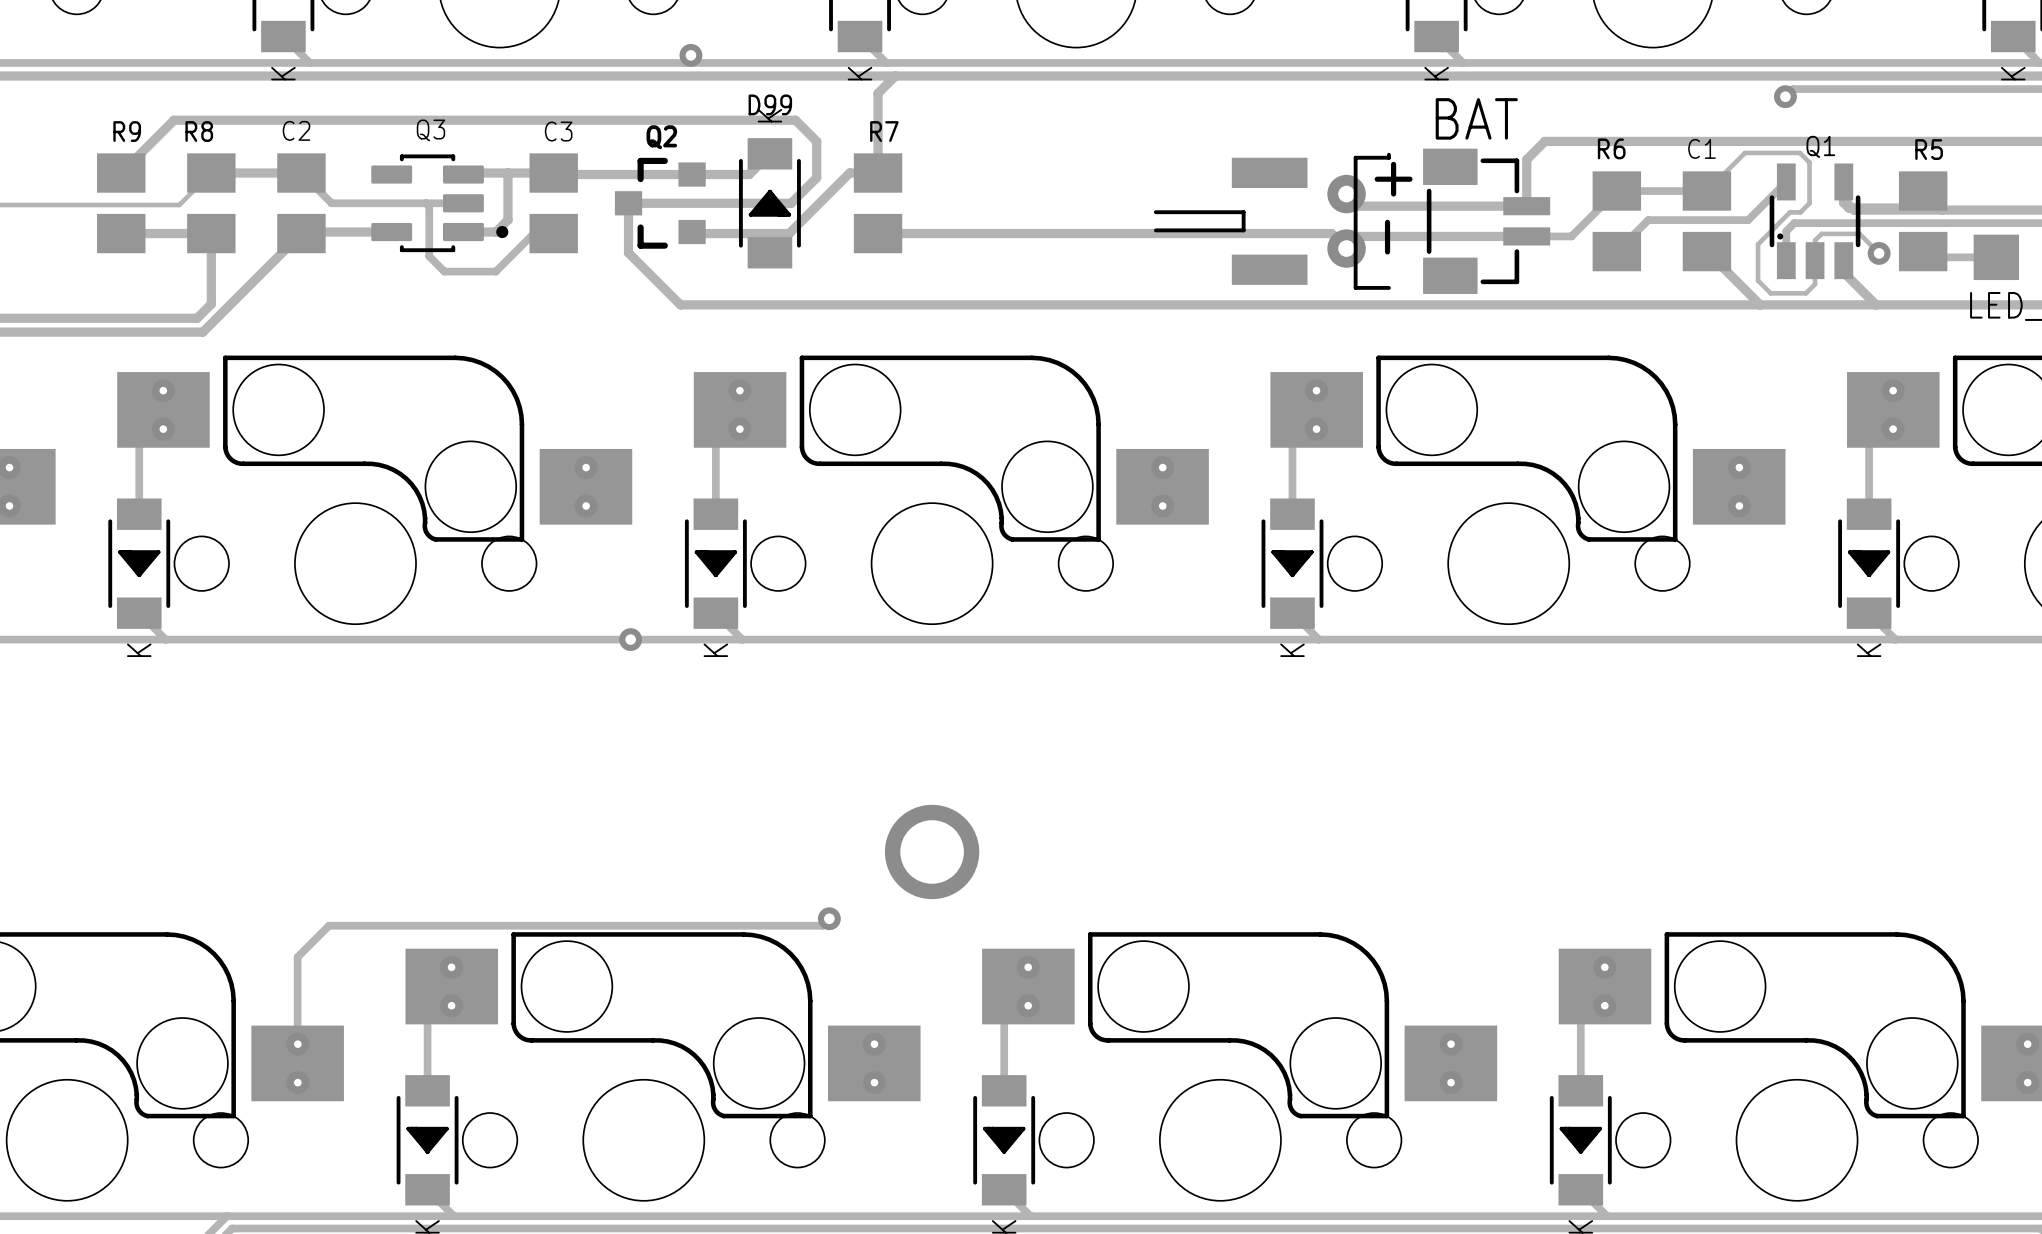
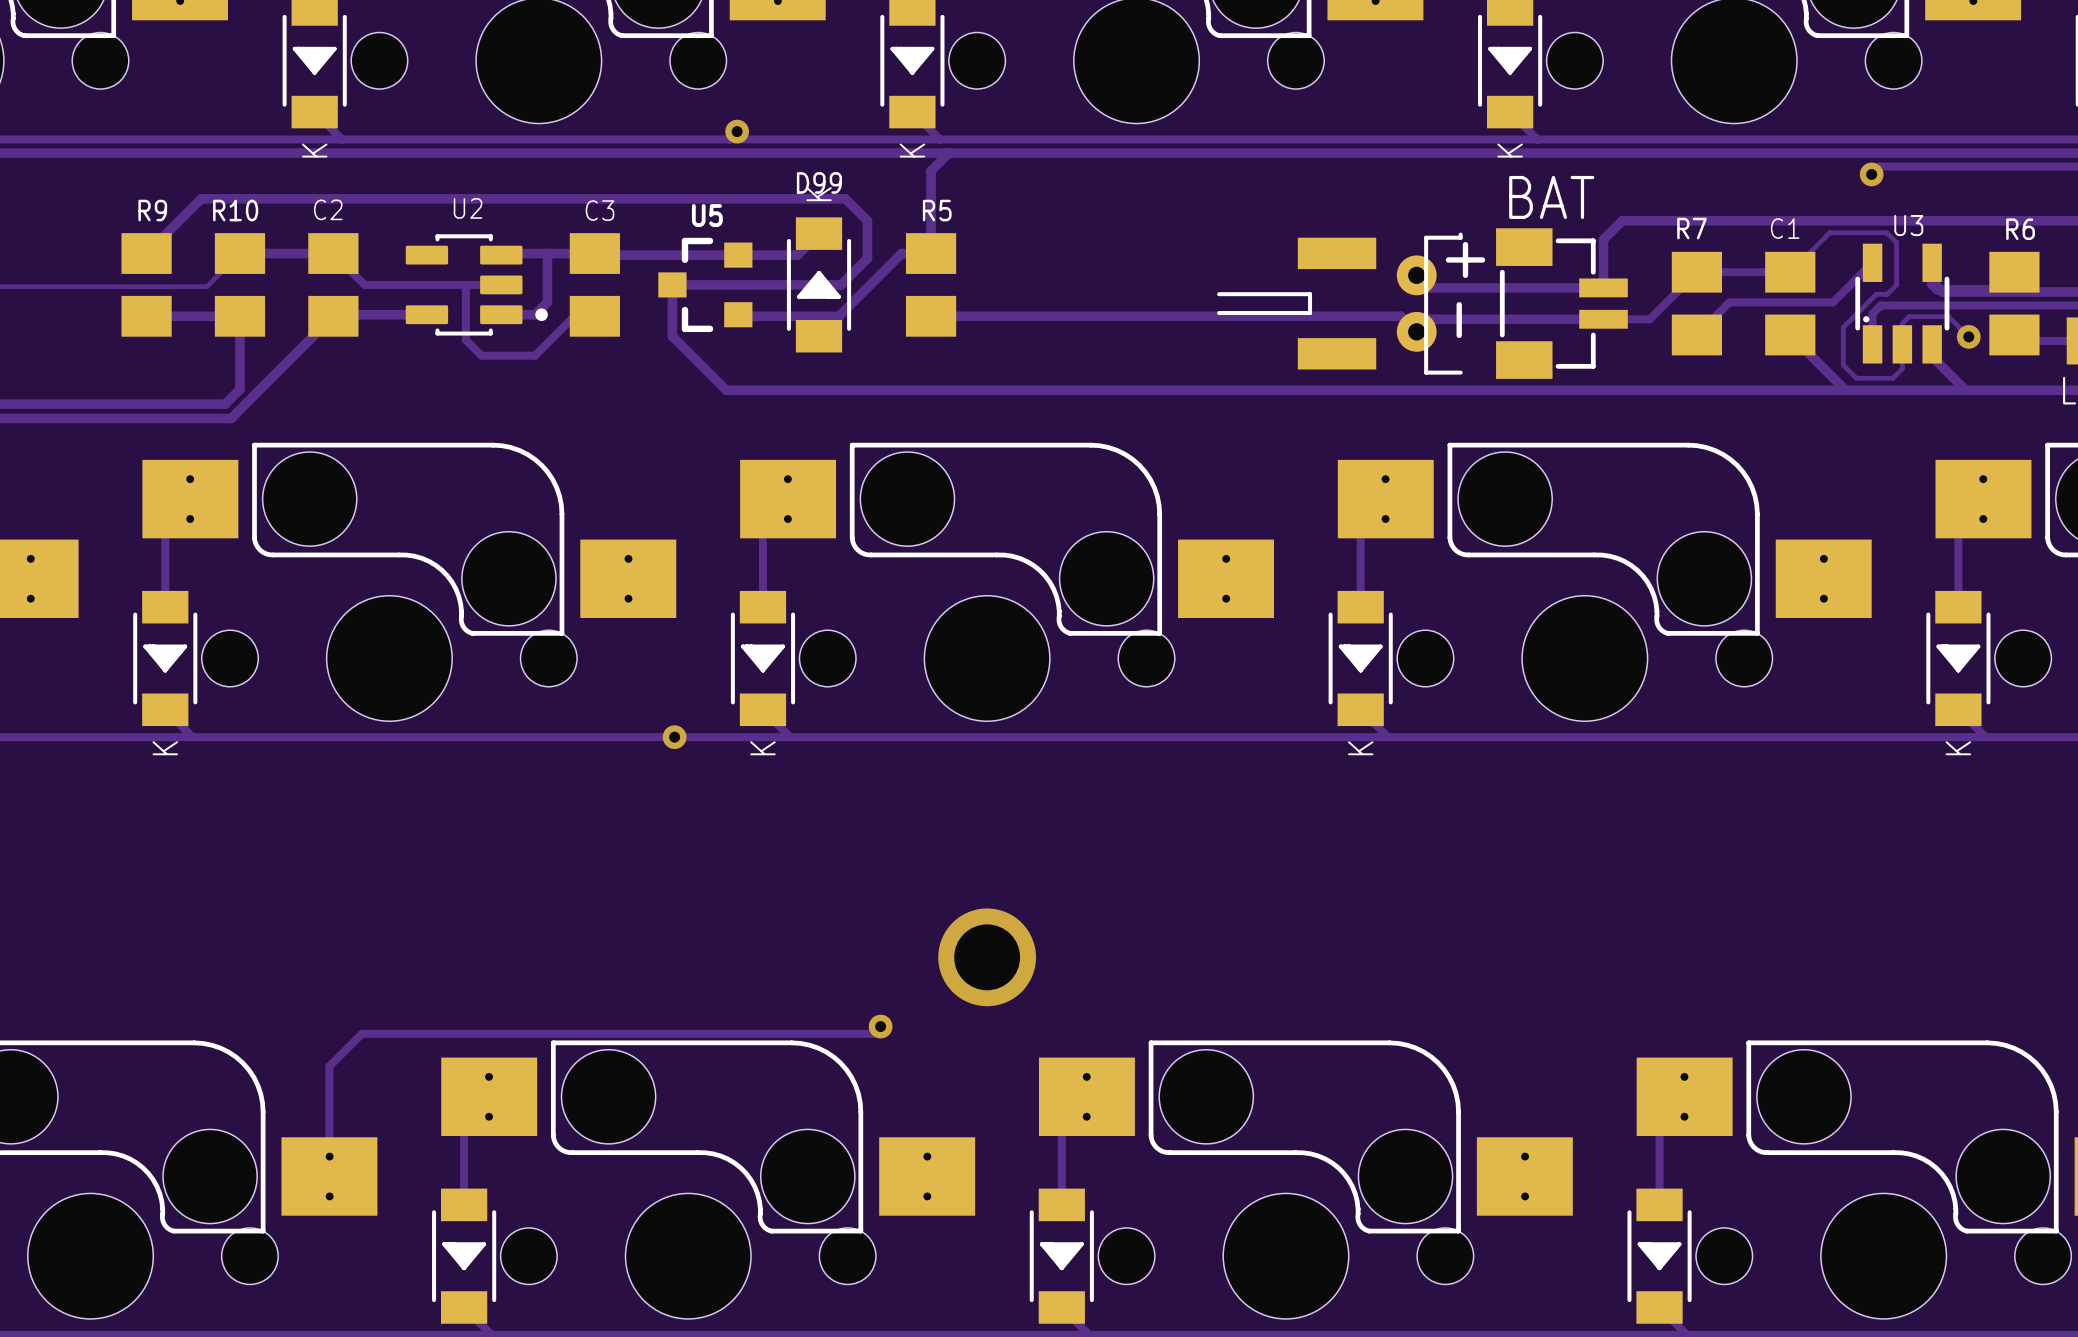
Q3 name: Q3 (430, 130) -> U2 (468, 208)
R8 name: R8 (199, 131) -> R10 (235, 210)
R7 name: R7 (884, 131) -> R5 (937, 210)
Q2 name: Q2 (661, 137) -> U5 (707, 215)
Q1 name: Q1 (1820, 146) -> U3 (1908, 225)
R6 name: R6 (1611, 148) -> R7 (1691, 228)
R5 name: R5 (1929, 149) -> R6 (2020, 229)

